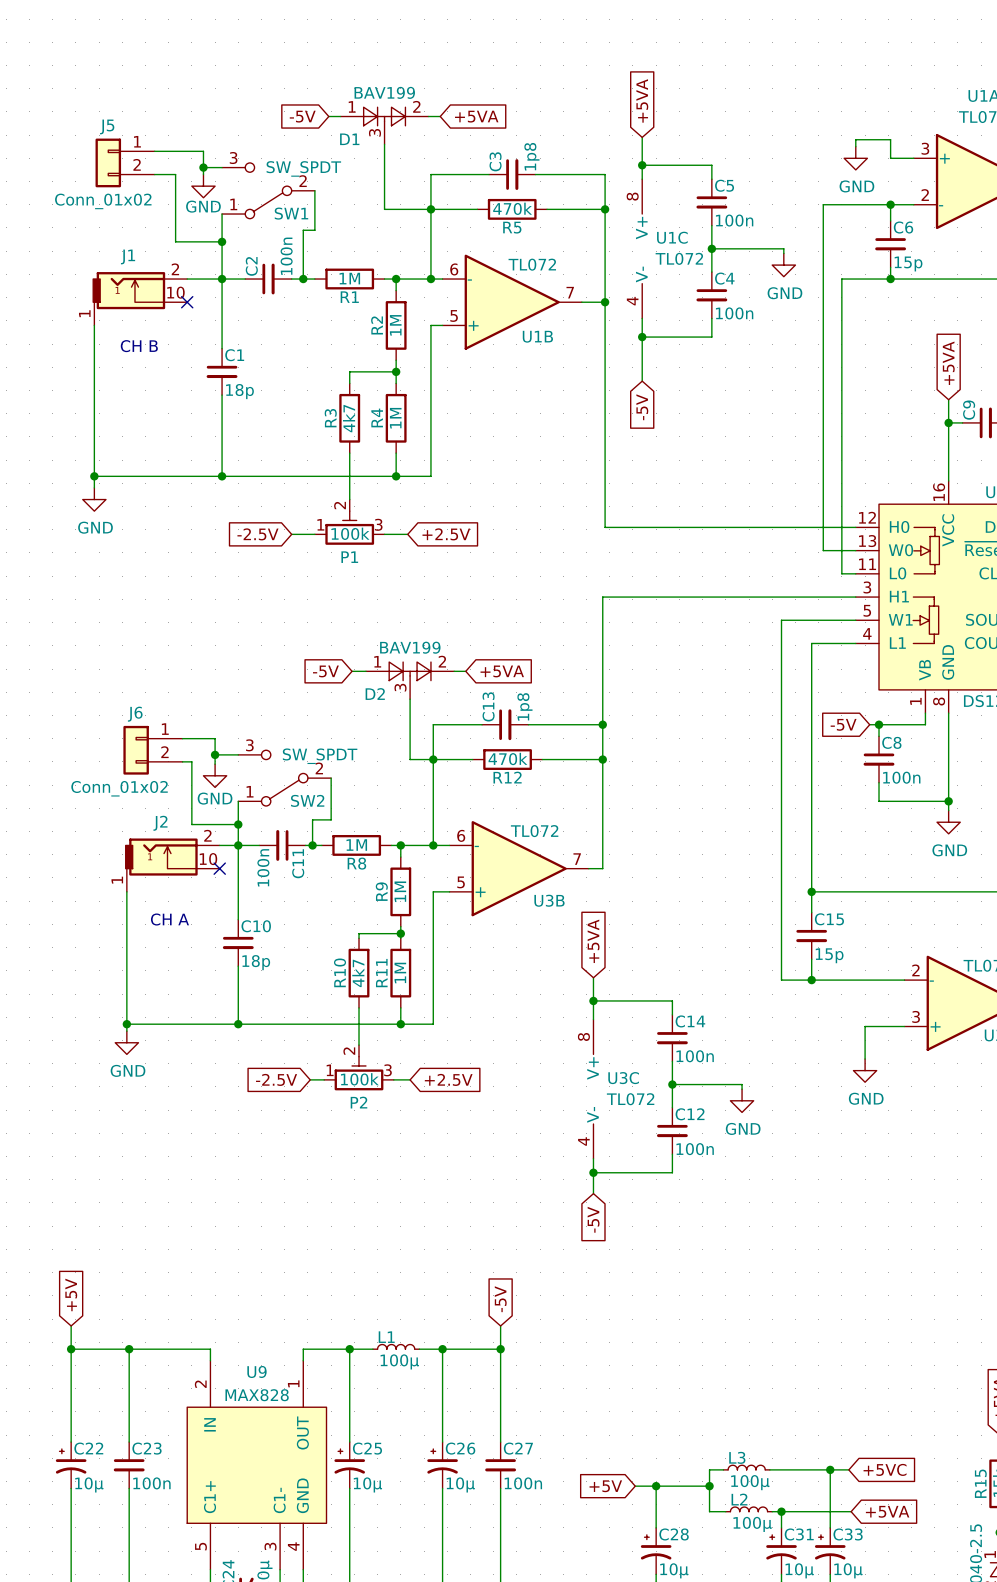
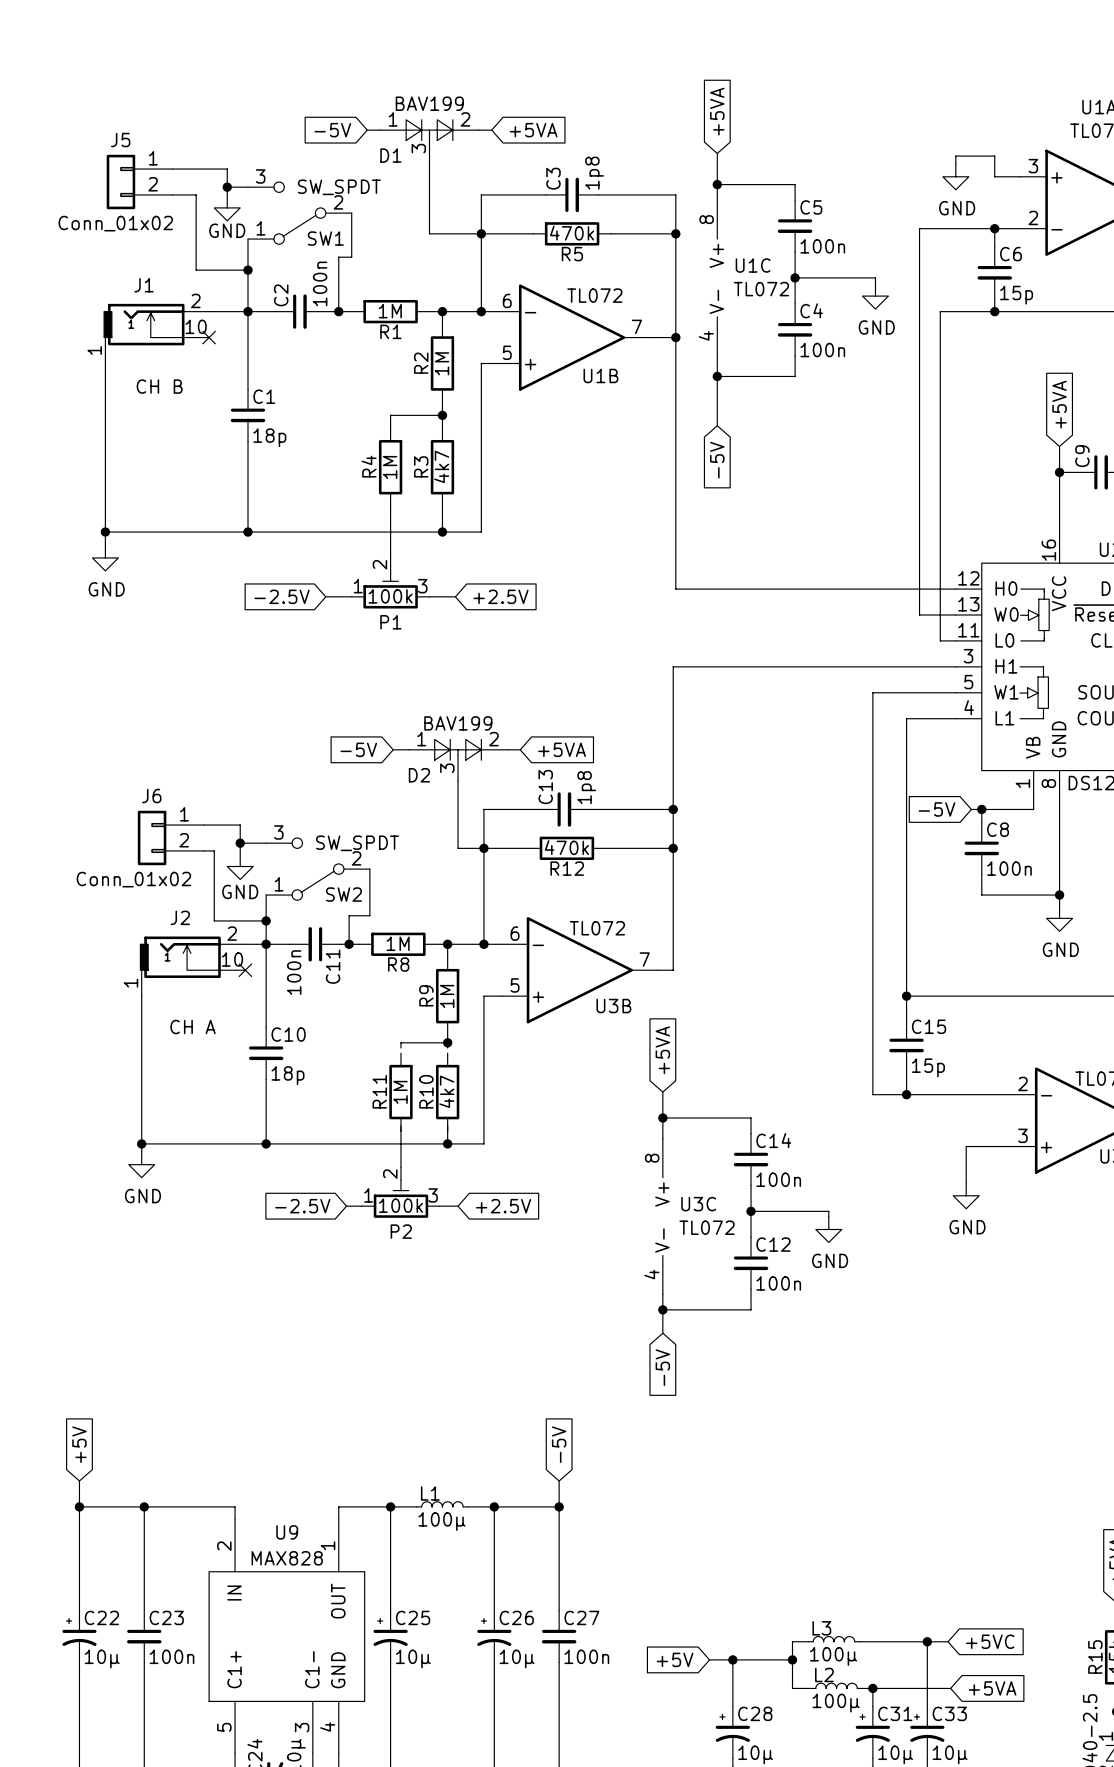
R4 name: R4 (377, 417) -> R3 (421, 466)
R3 name: R3 (330, 418) -> R4 (369, 466)
R3 value: 4k7 (349, 418) -> 1M (390, 467)
R4 value: 1M (395, 418) -> 4k7 (441, 466)
R10 position: (359, 973) -> (447, 1092)
R11 position: (400, 973) -> (400, 1092)

